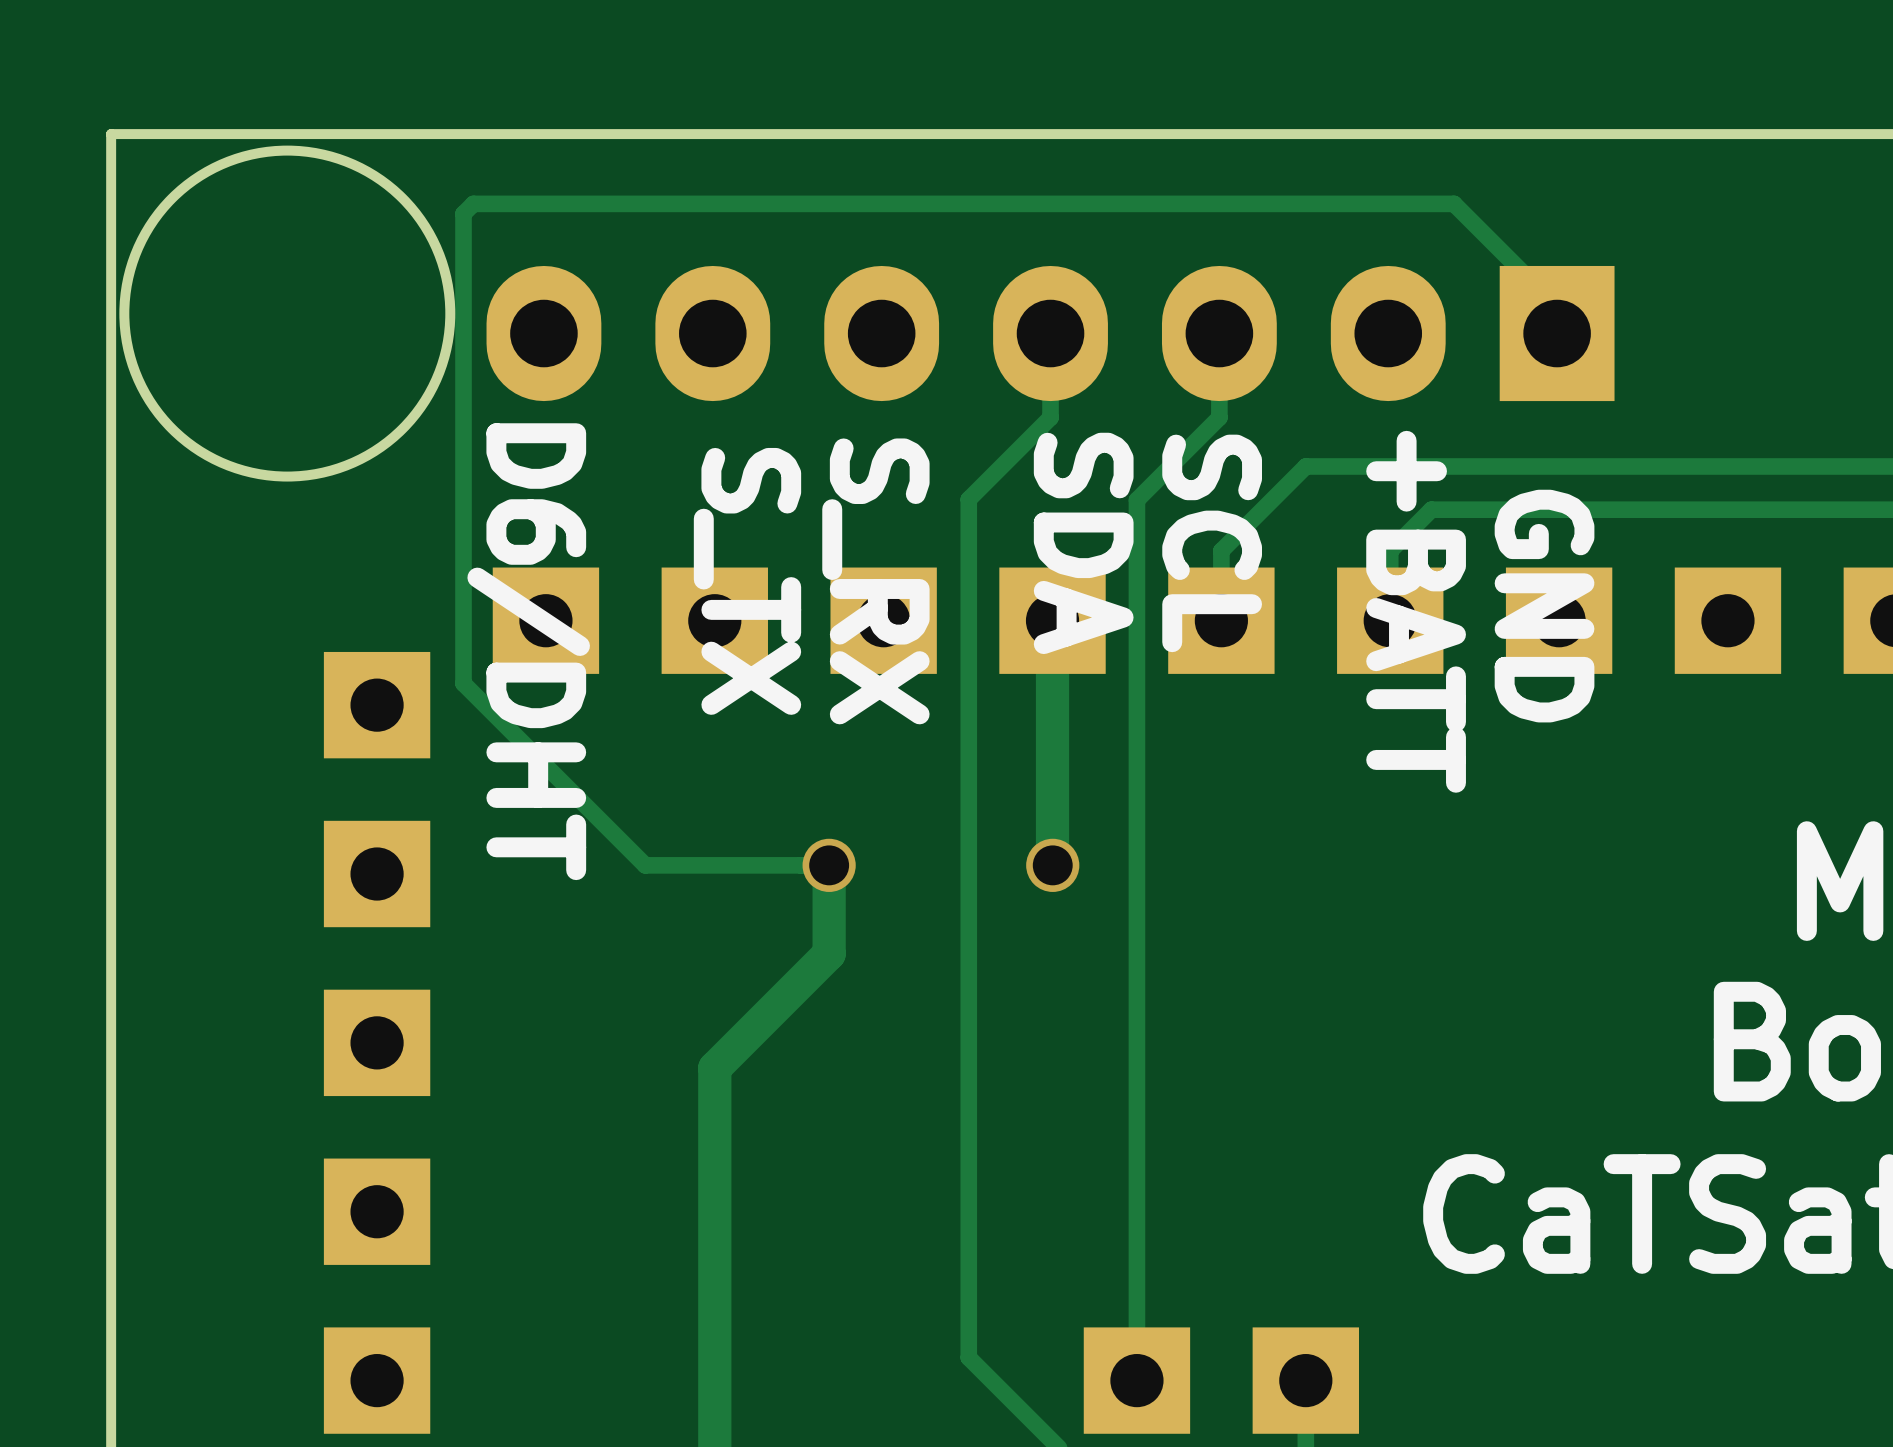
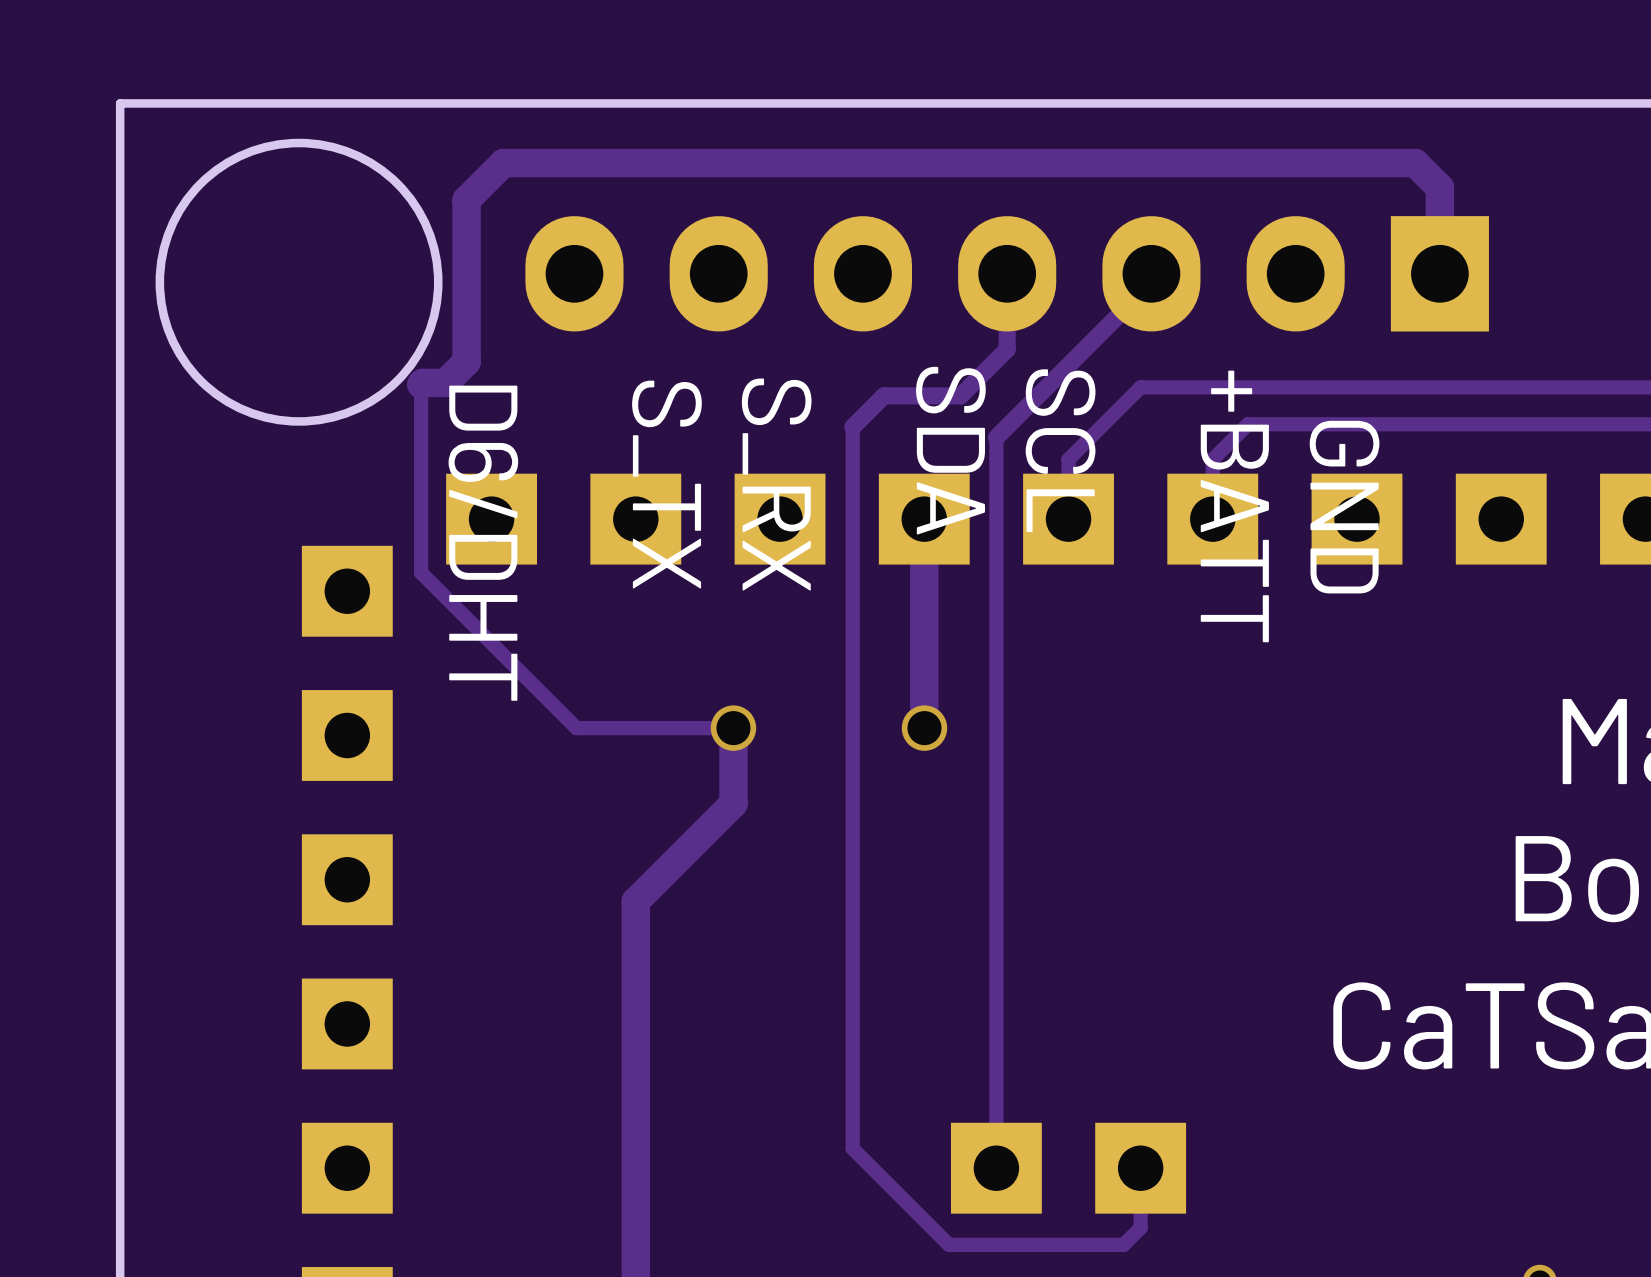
track: (559, 203) (473, 203) (463, 213) (463, 463) -> (503, 163) (466, 199) (466, 361) (445, 382) (422, 382) (421, 384)
track: (1454, 203) (1557, 306) (1557, 333) -> (1267, 163) (1415, 163) (1439, 187) (1439, 273)
track width: thin (1454, 203) (559, 203) -> thick (1267, 163) (503, 163)
round board edge position: (287, 313) -> (299, 282)
track: (1050, 333) (1050, 417) (968, 499) (968, 513) -> (1007, 273) (1007, 349) (960, 395) (883, 395) (852, 427)
part position: (1050, 333) -> (1007, 273)
track: (1219, 333) (1219, 417) (1136, 500) (1136, 525) -> (1151, 273) (1151, 282) (996, 437)

